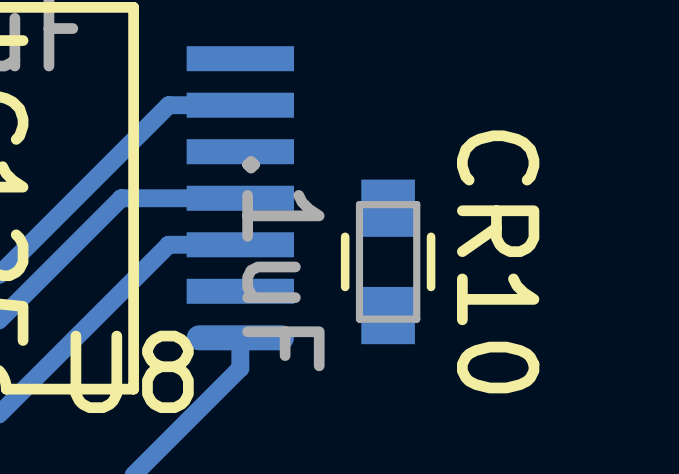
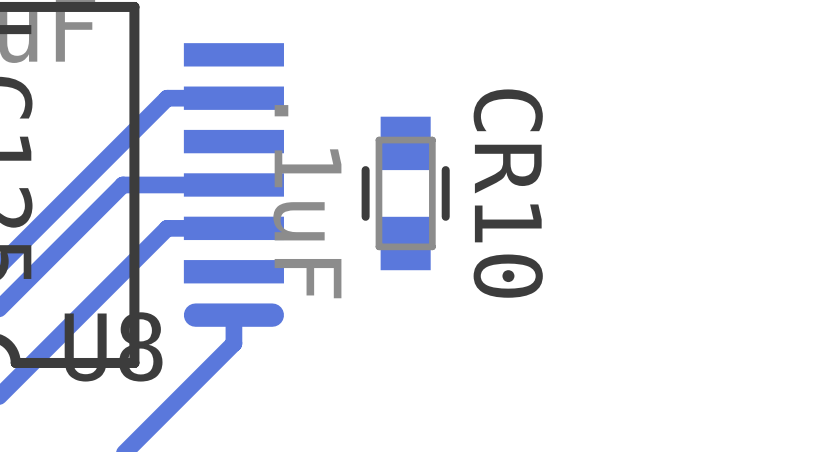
CR10 position: (388, 261) -> (405, 193)

